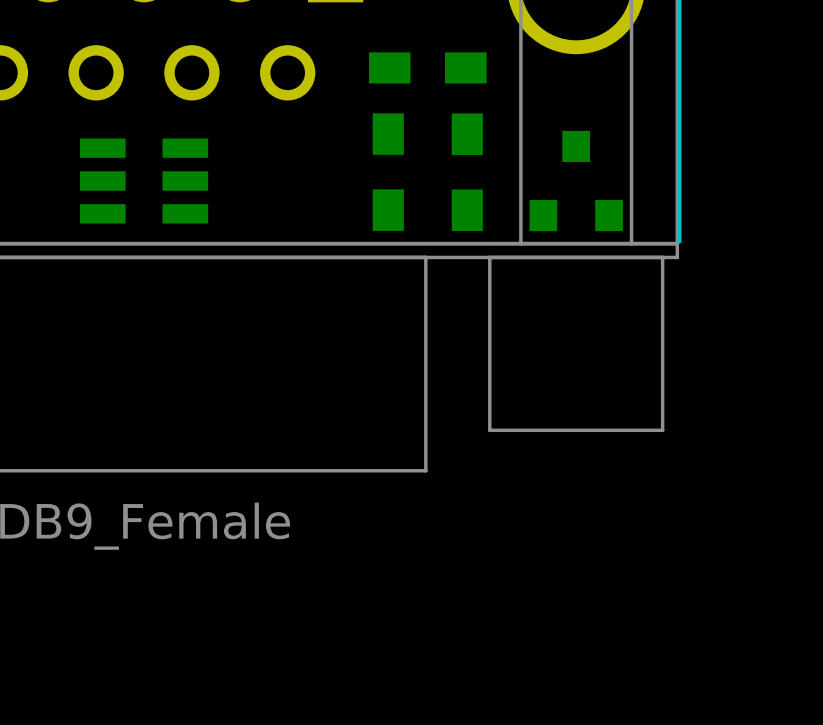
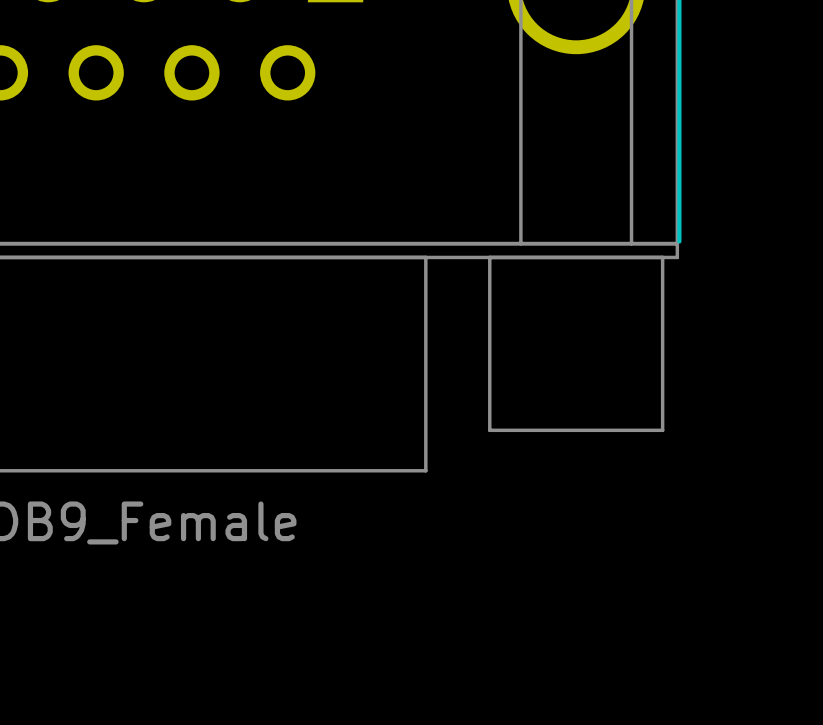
part: (427, 67) -> none
part: (388, 172) -> none
part: (467, 172) -> none
part: (144, 181) -> none
part: (576, 181) -> none

